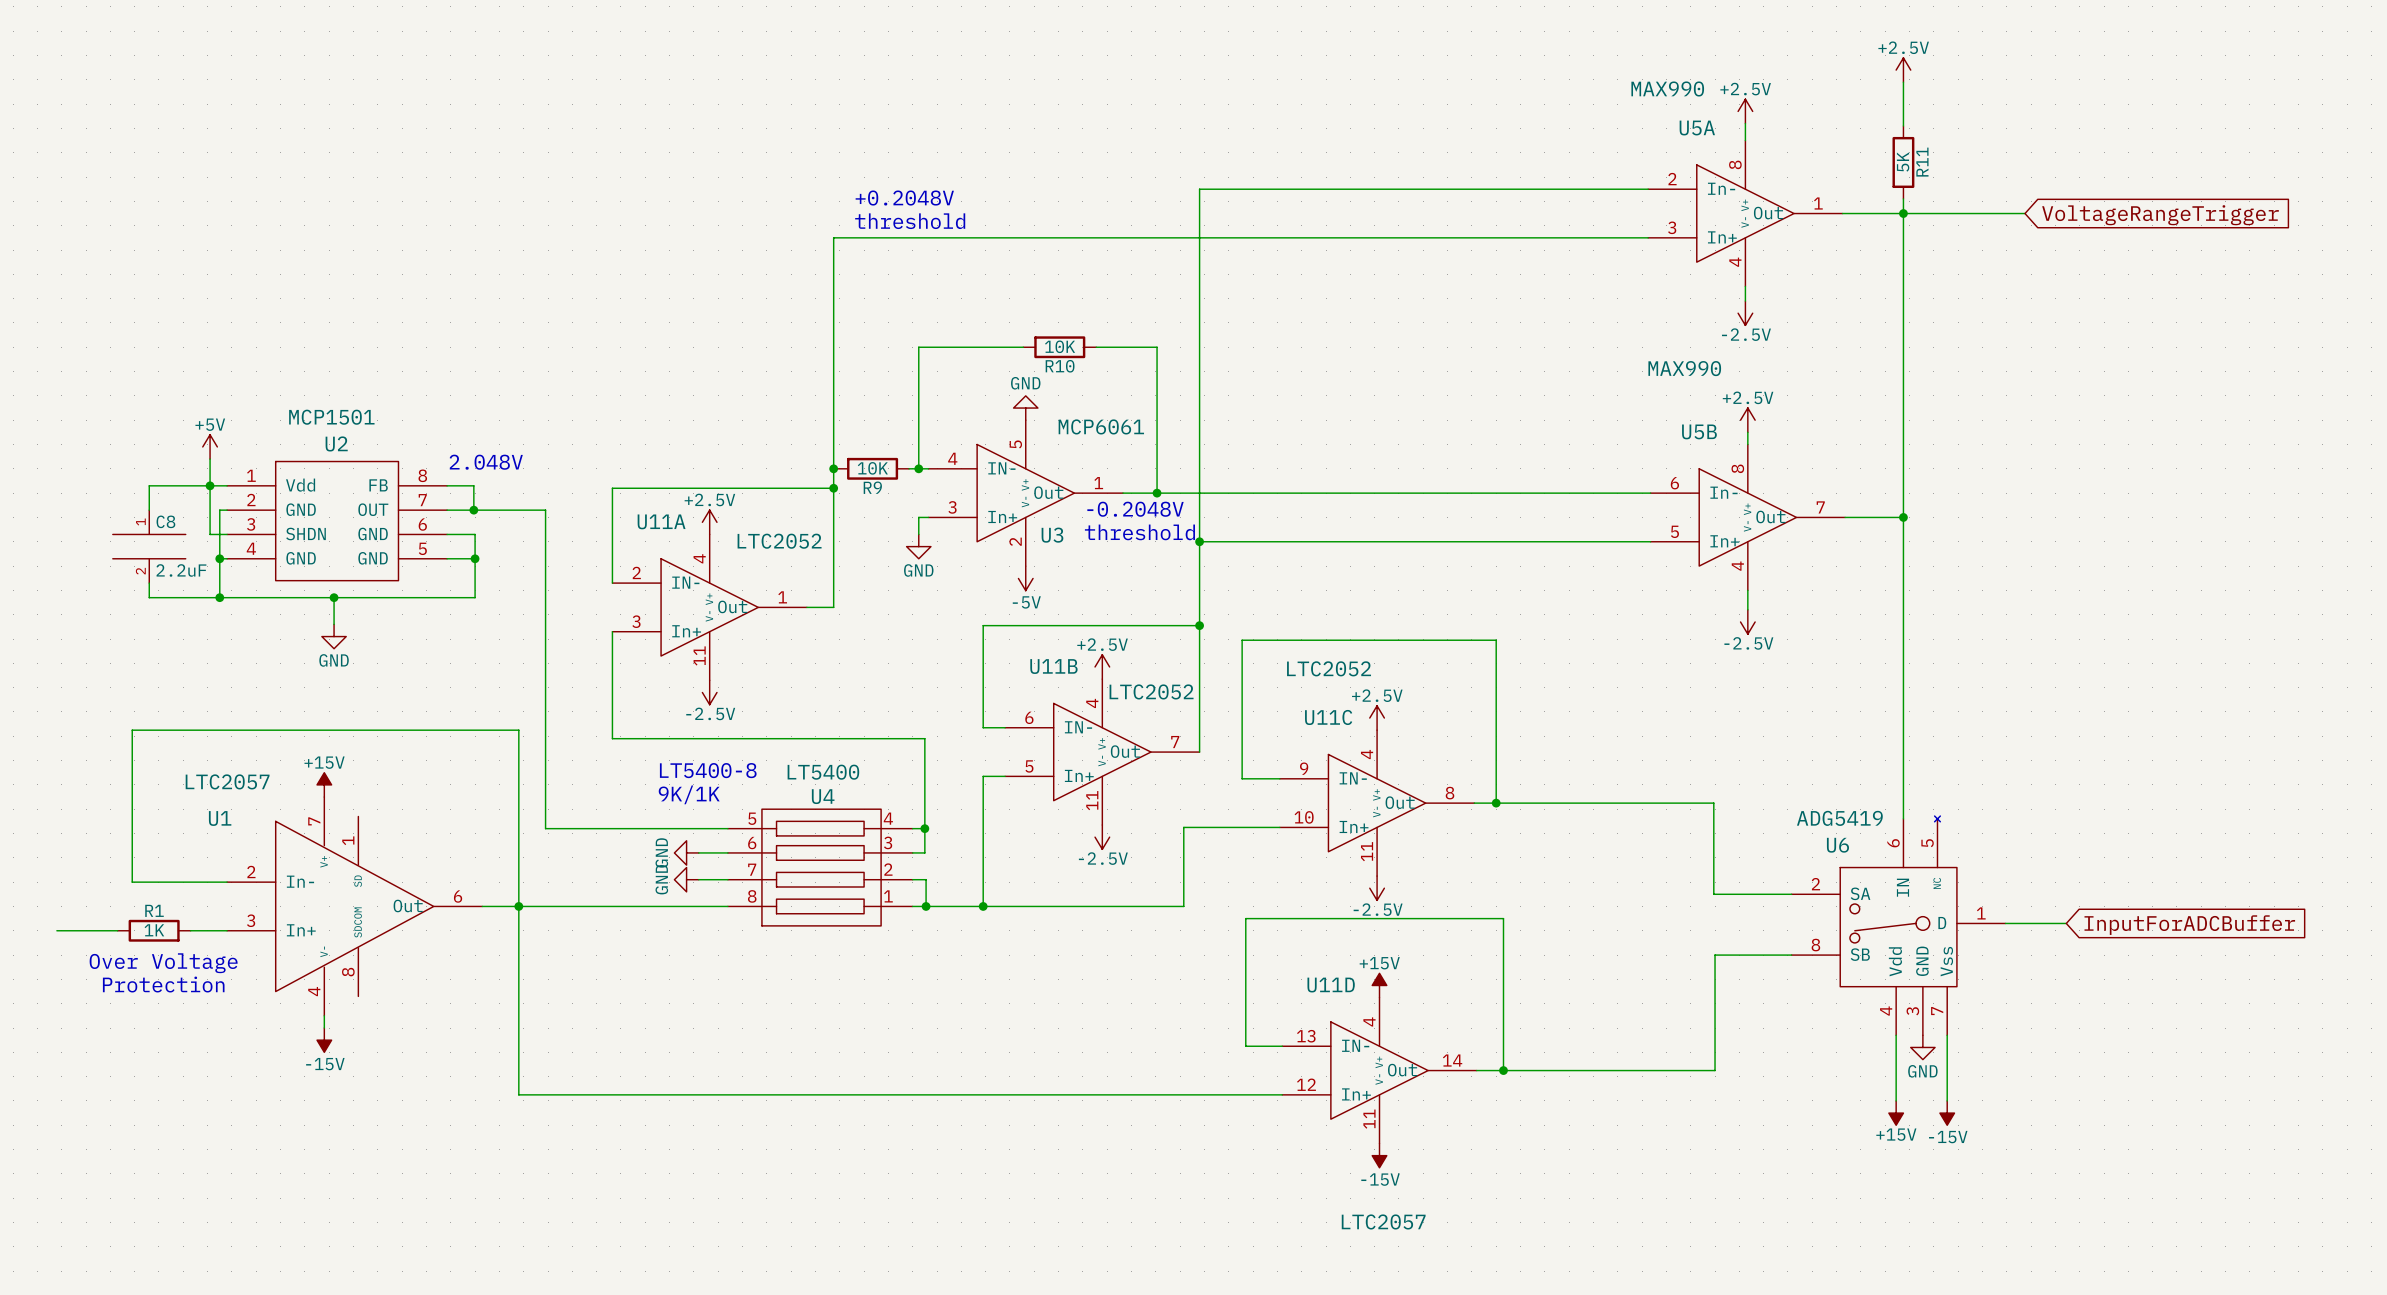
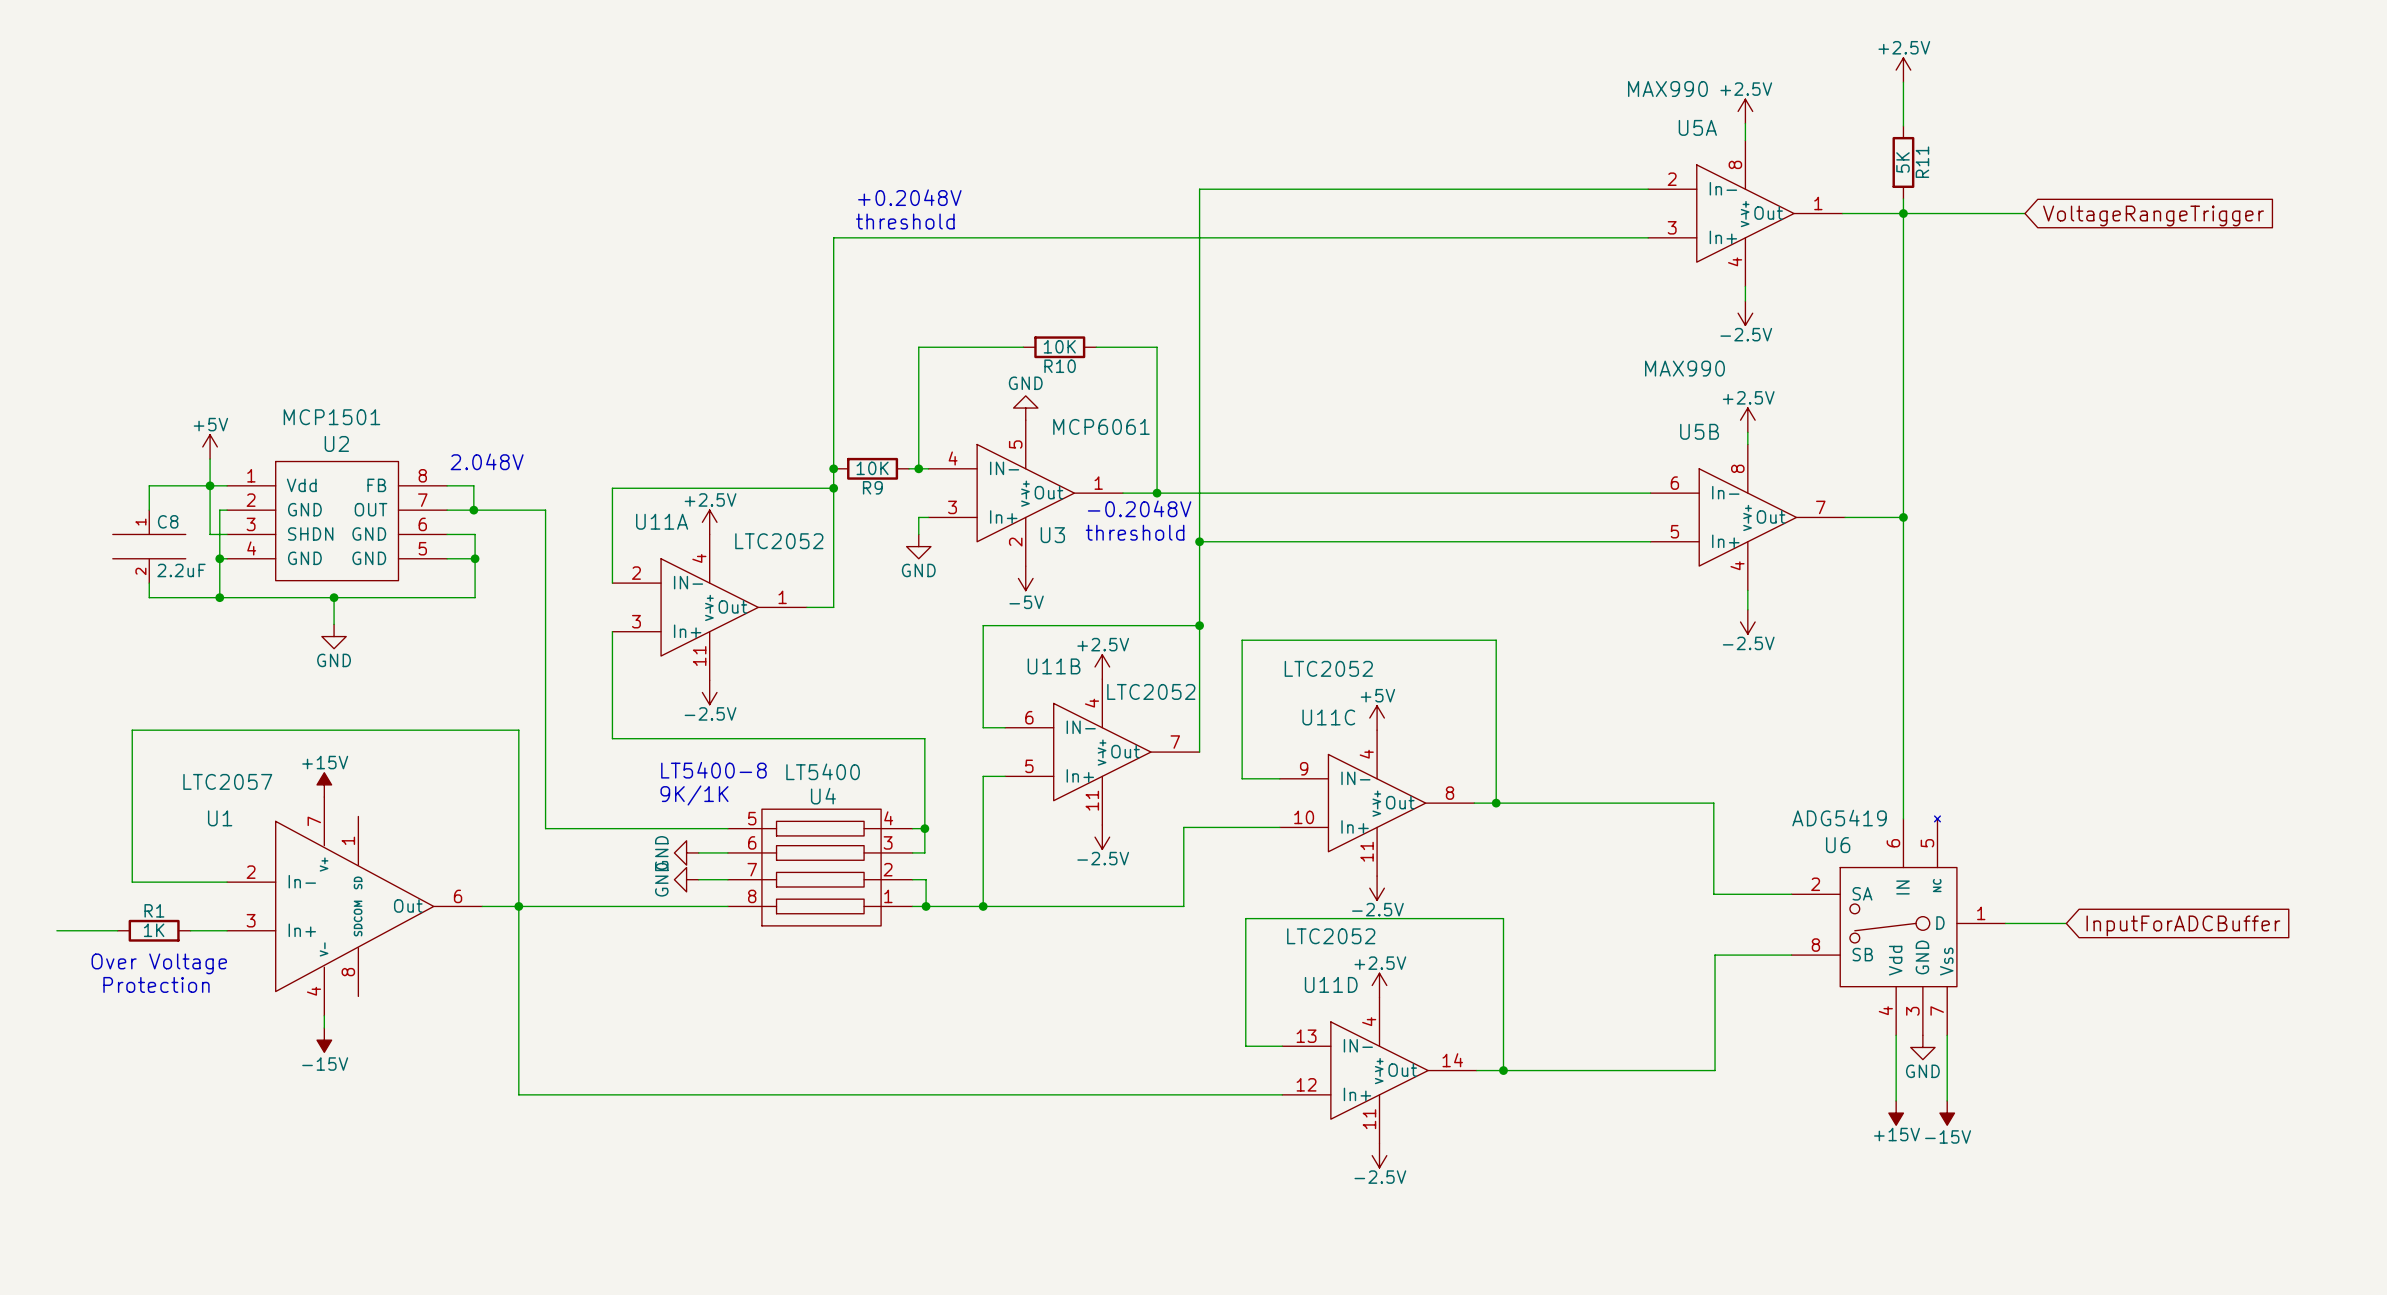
power symbol: +2.5V (1377, 718) -> +5V (1377, 718)
power symbol: +15V (1379, 985) -> +2.5V (1379, 985)
power symbol: -15V (1379, 1155) -> -2.5V (1379, 1155)
U11D value: LTC2057 (1383, 1221) -> LTC2052 (1331, 936)

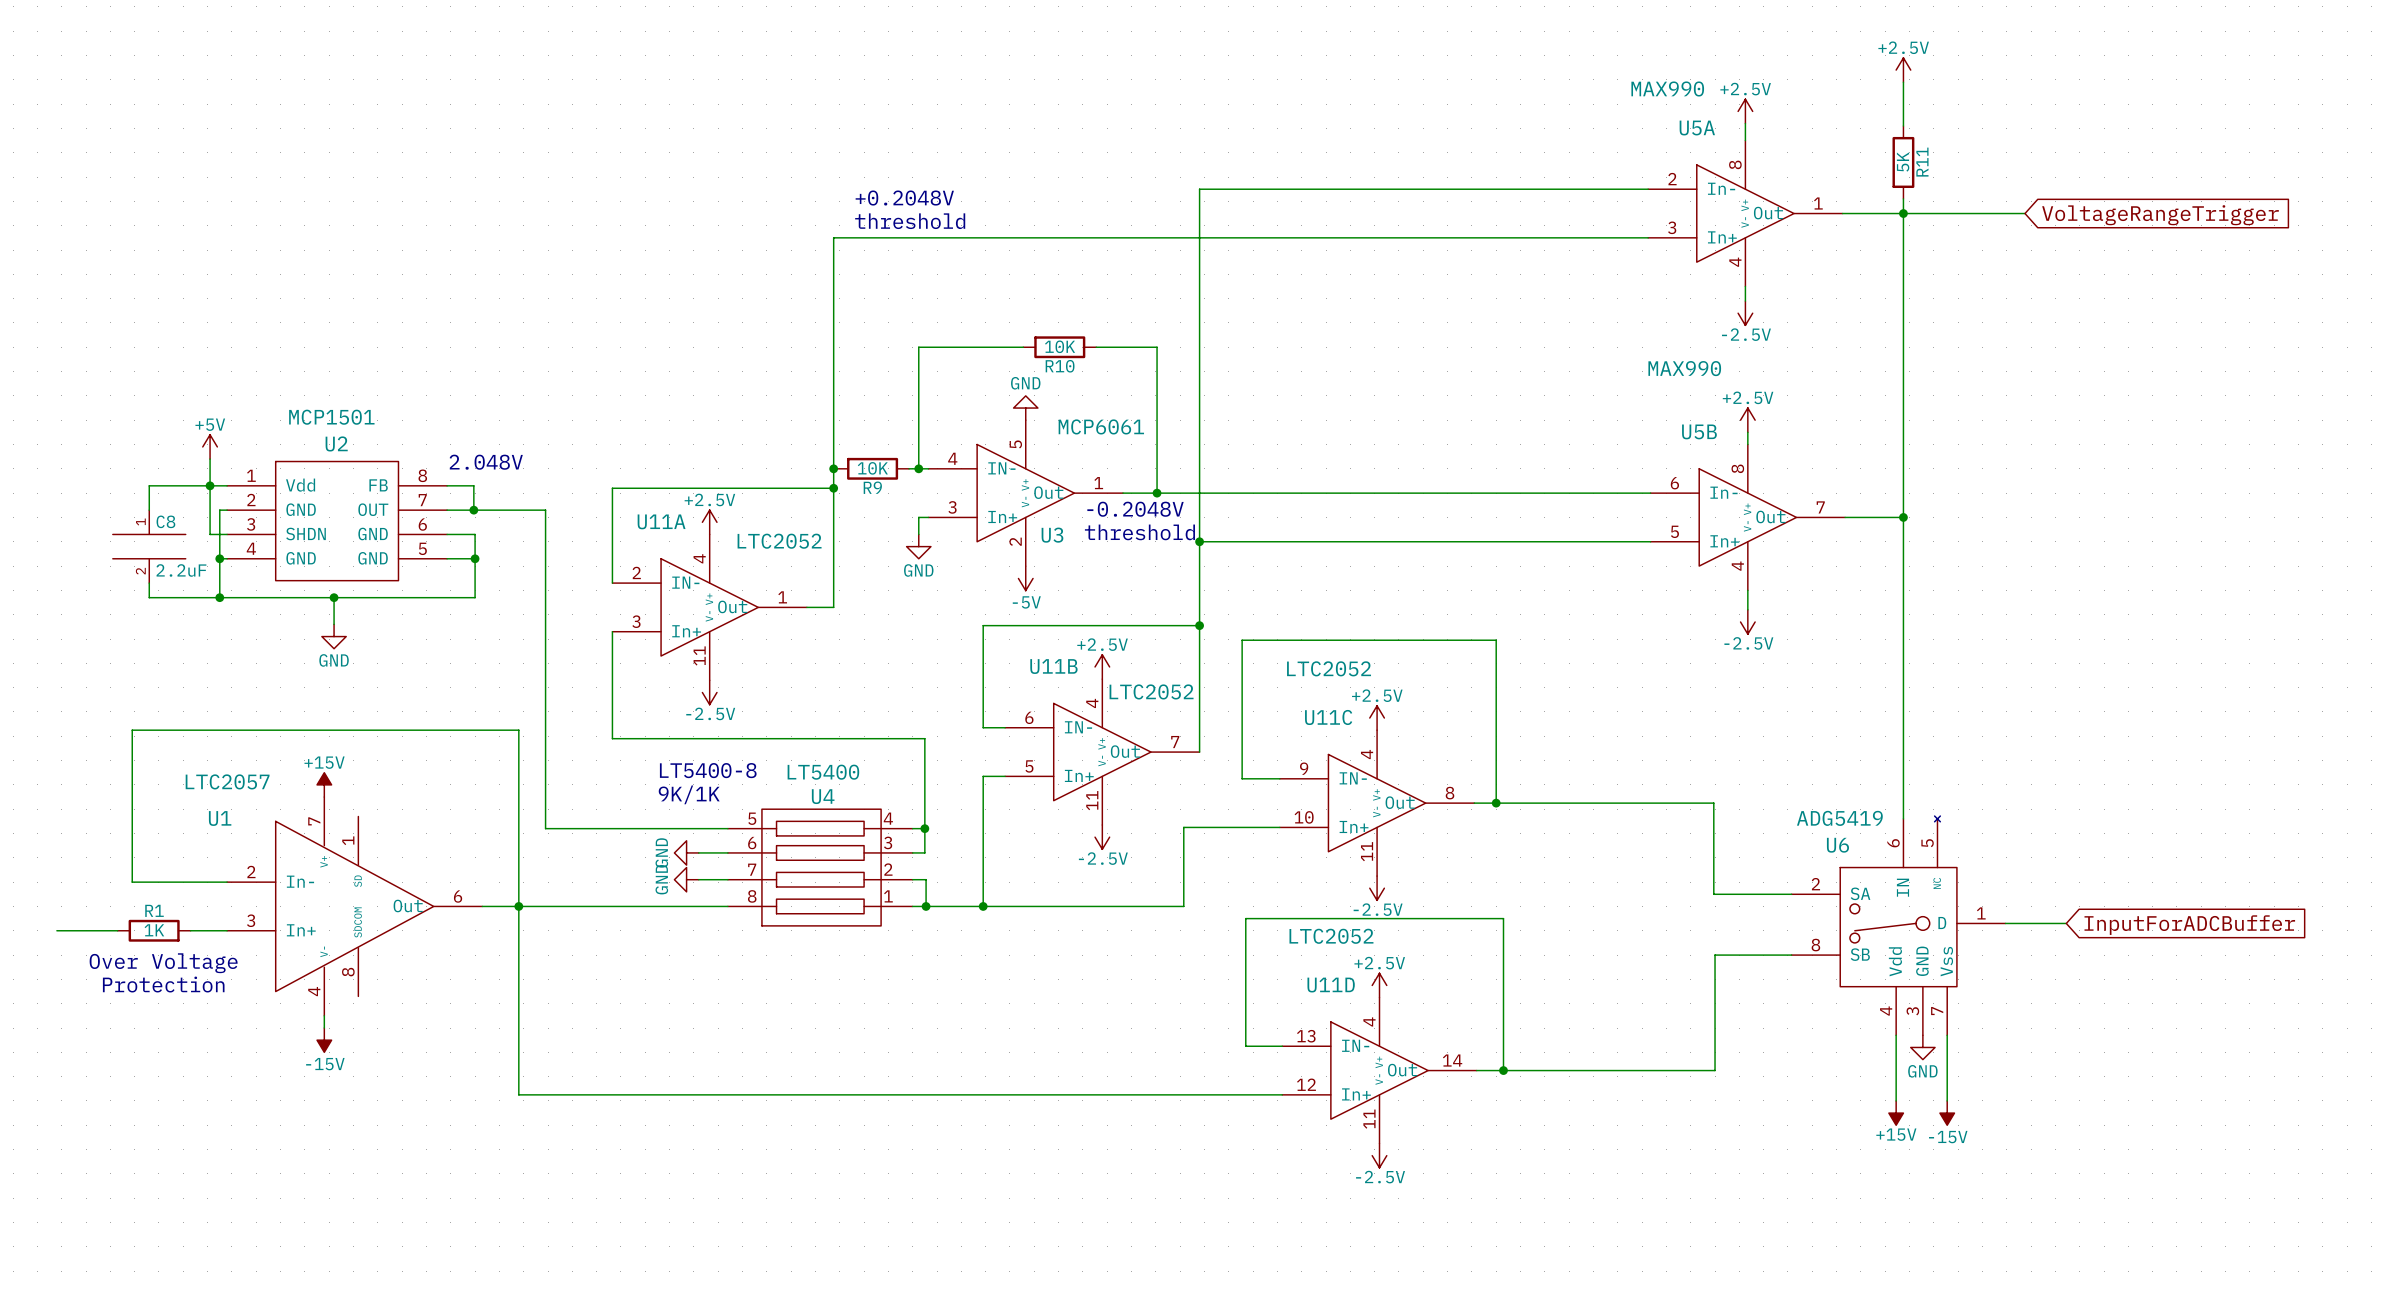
power symbol: +5V (1377, 718) -> +2.5V (1377, 718)

